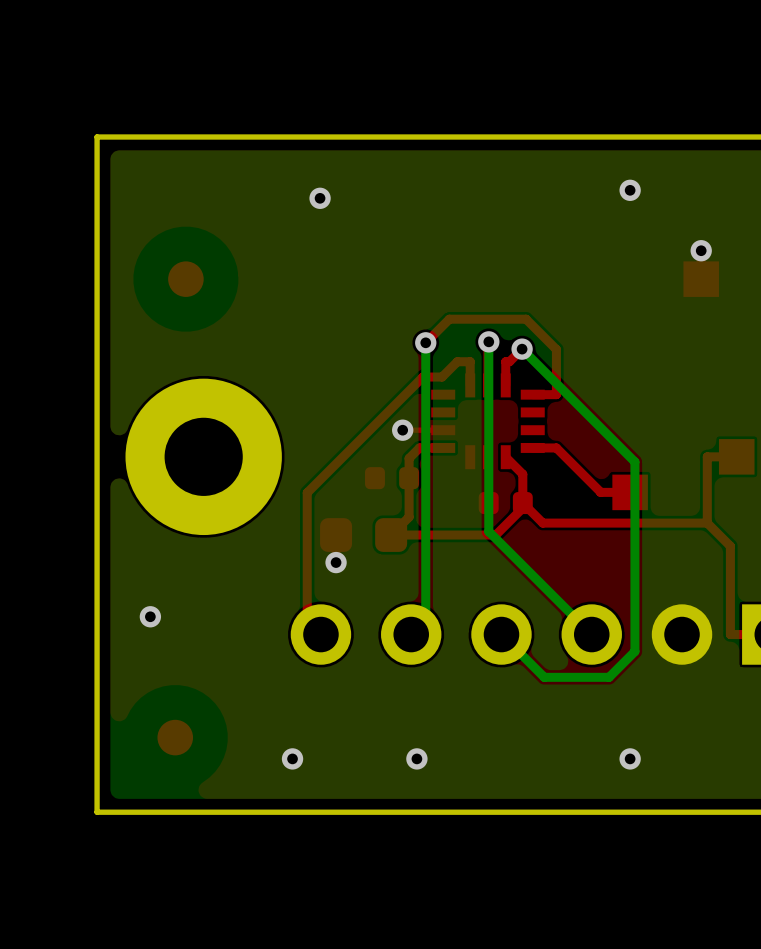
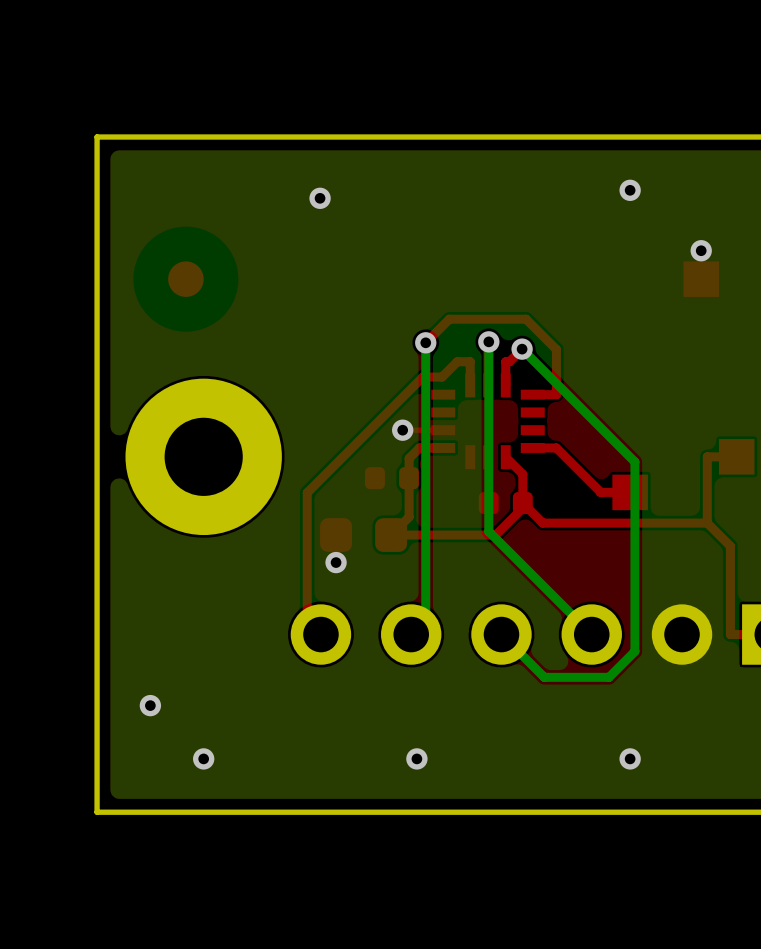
via: (150, 616) -> none
via: none -> (150, 705)
part: (175, 737) -> none
via: none -> (203, 758)
via: (292, 758) -> none

